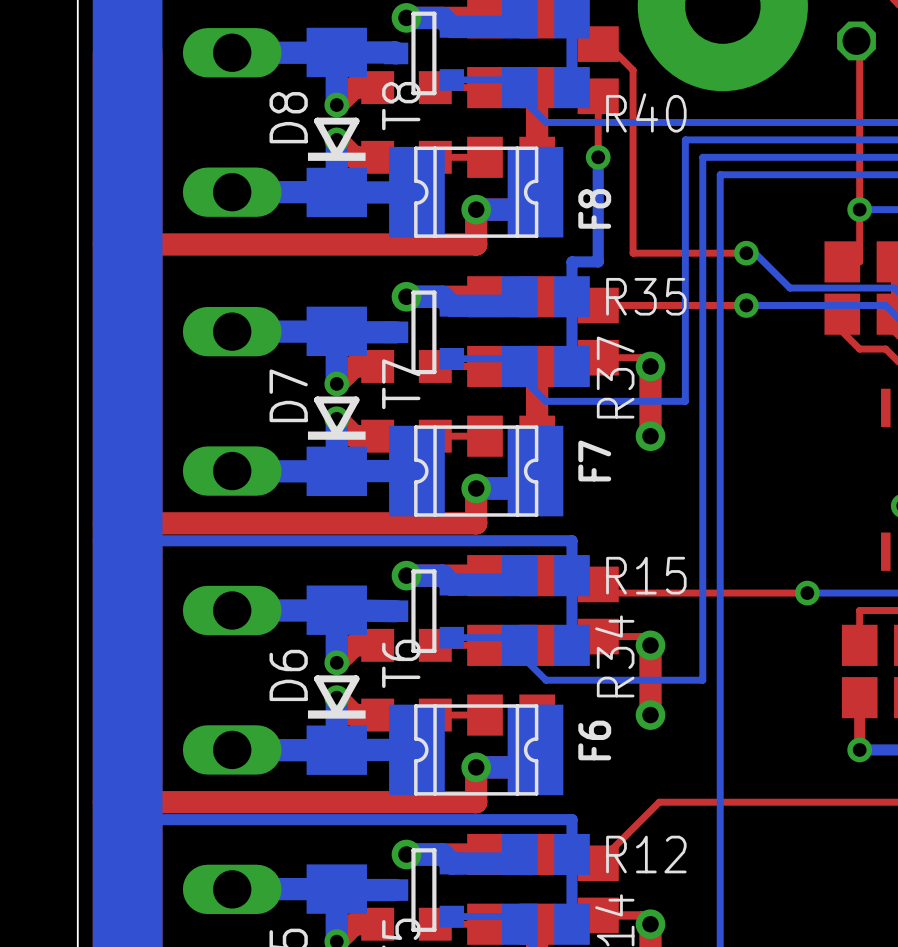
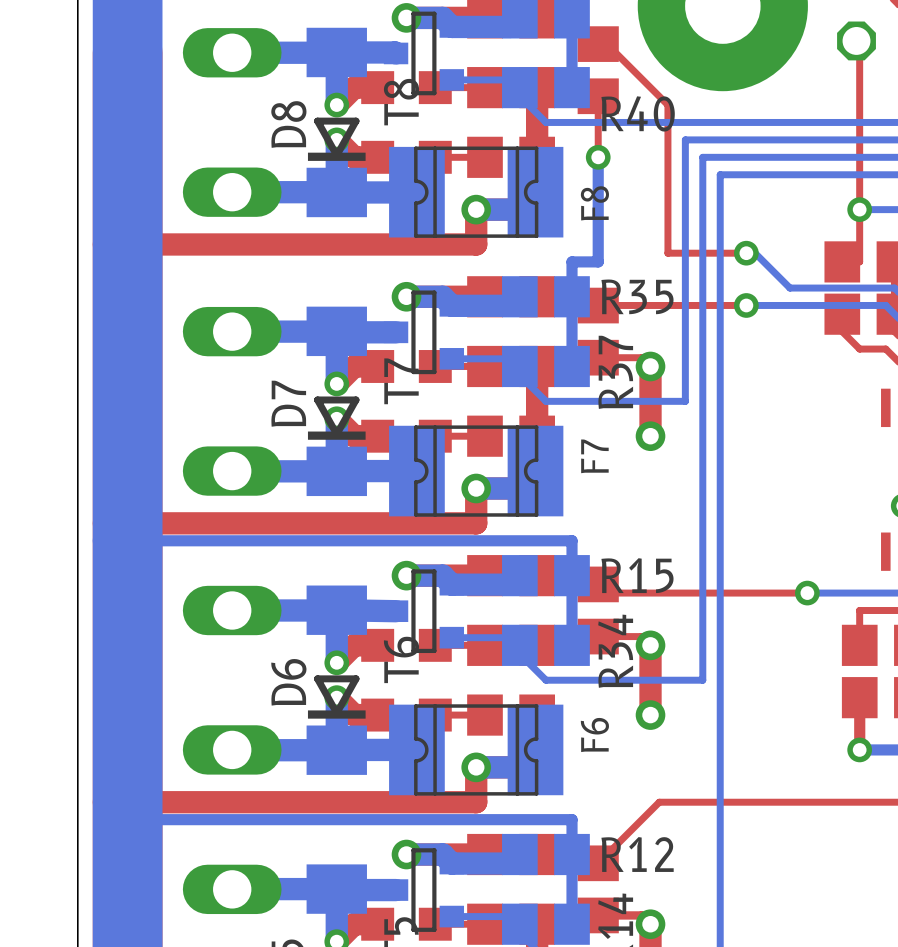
top track: (633, 70) (633, 253) (667, 253) -> (633, 70) (667, 105) (667, 253)

